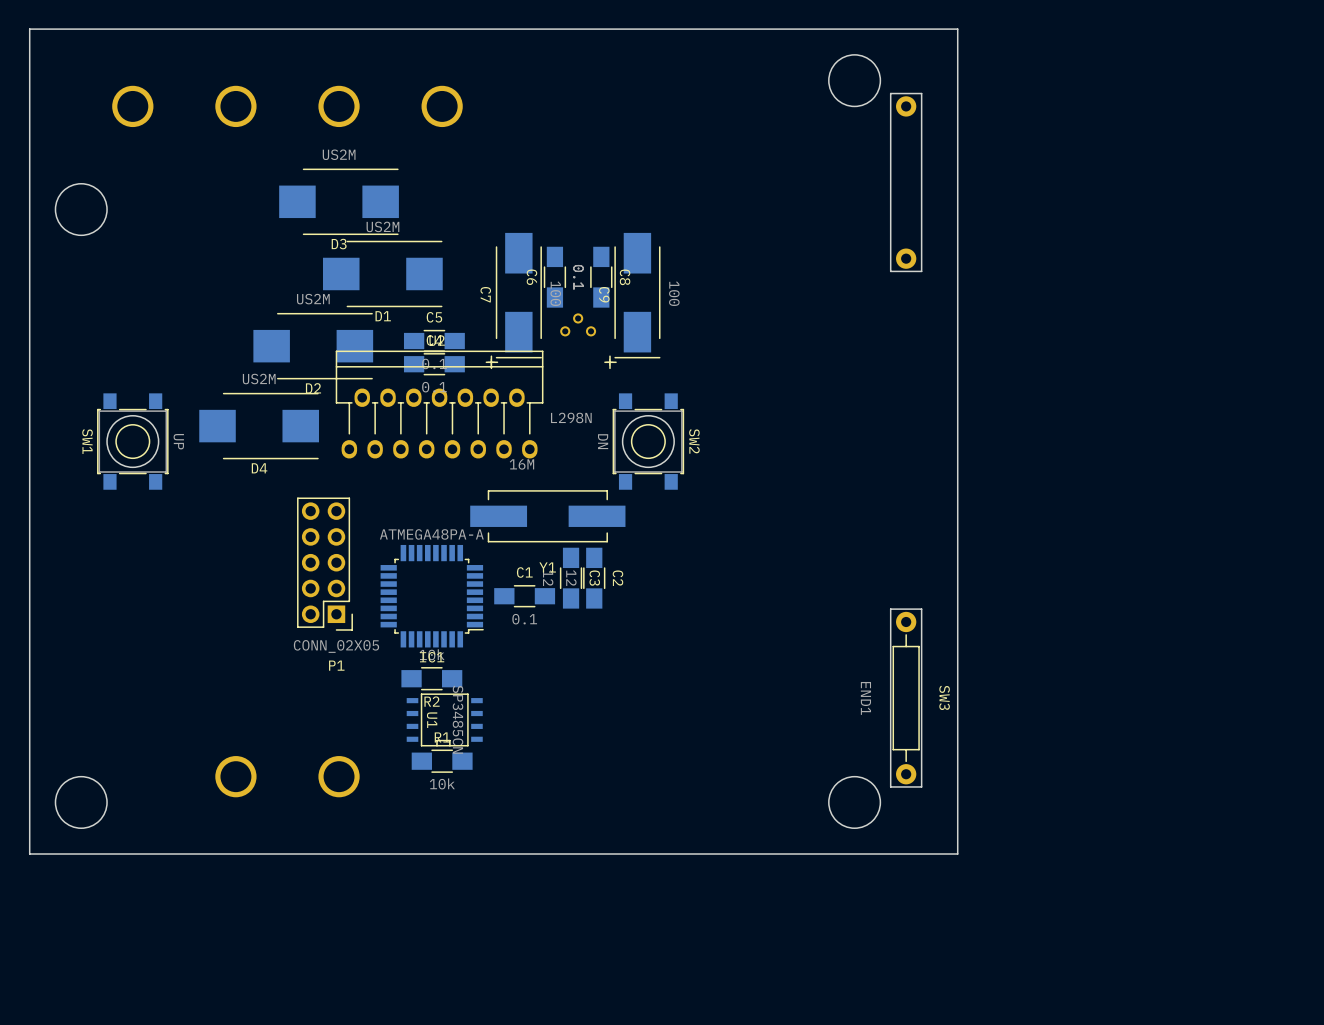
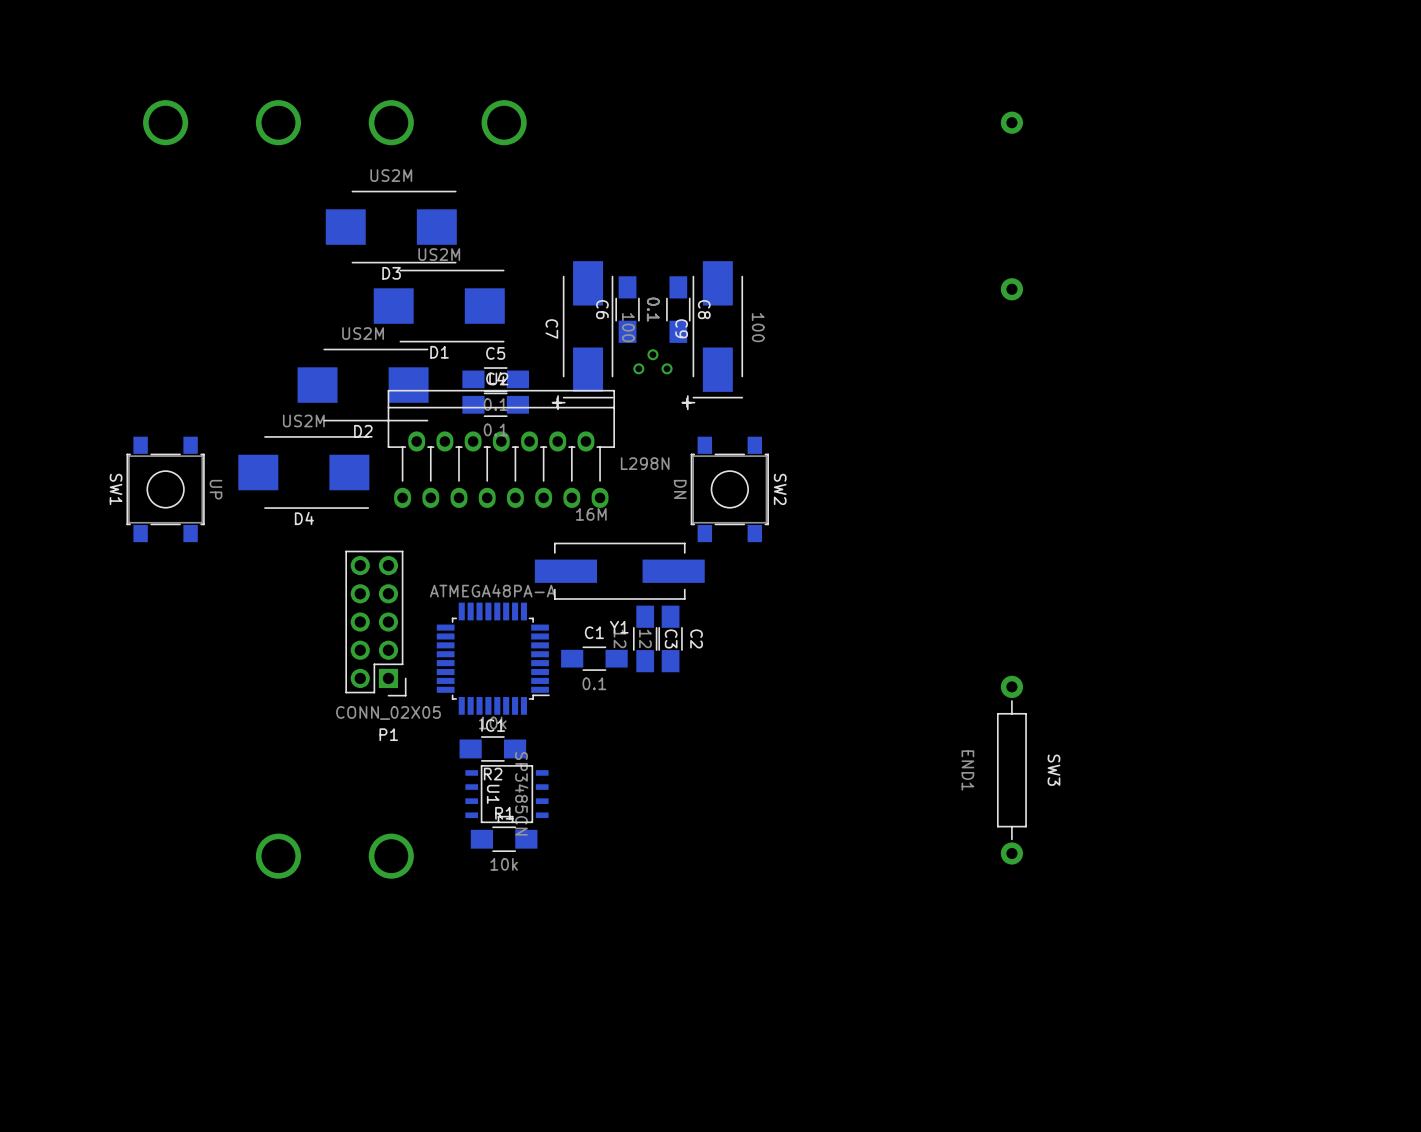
board edge: (957, 29) (957, 854) (29, 854) (29, 29) (957, 29) -> none
round board edge: [828, 54, 882, 108] -> none
board edge: (921, 93) (921, 271) (890, 271) (890, 93) (921, 93) -> none
round board edge: [54, 183, 108, 237] -> none
round board edge: [106, 415, 160, 469] -> none
round board edge: [621, 415, 675, 469] -> none
board edge: (921, 609) (921, 786) (890, 786) (890, 609) (921, 609) -> none
round board edge: [54, 775, 108, 829] -> none
round board edge: [828, 775, 882, 829] -> none

